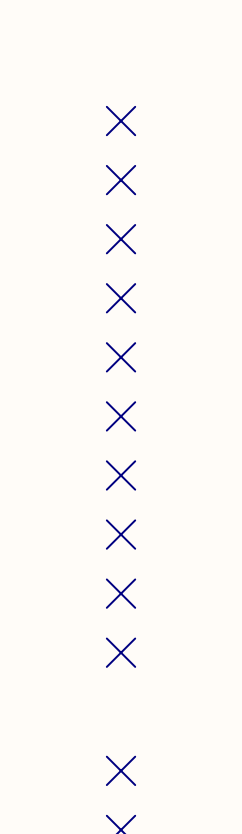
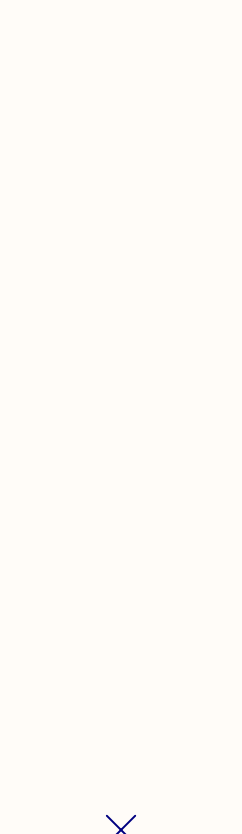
no-connect mark: (121, 121) -> none
no-connect mark: (121, 180) -> none
no-connect mark: (121, 239) -> none
no-connect mark: (121, 298) -> none
no-connect mark: (121, 357) -> none
no-connect mark: (121, 416) -> none
no-connect mark: (121, 475) -> none
no-connect mark: (121, 534) -> none
no-connect mark: (121, 593) -> none
no-connect mark: (121, 652) -> none
no-connect mark: (121, 770) -> none

